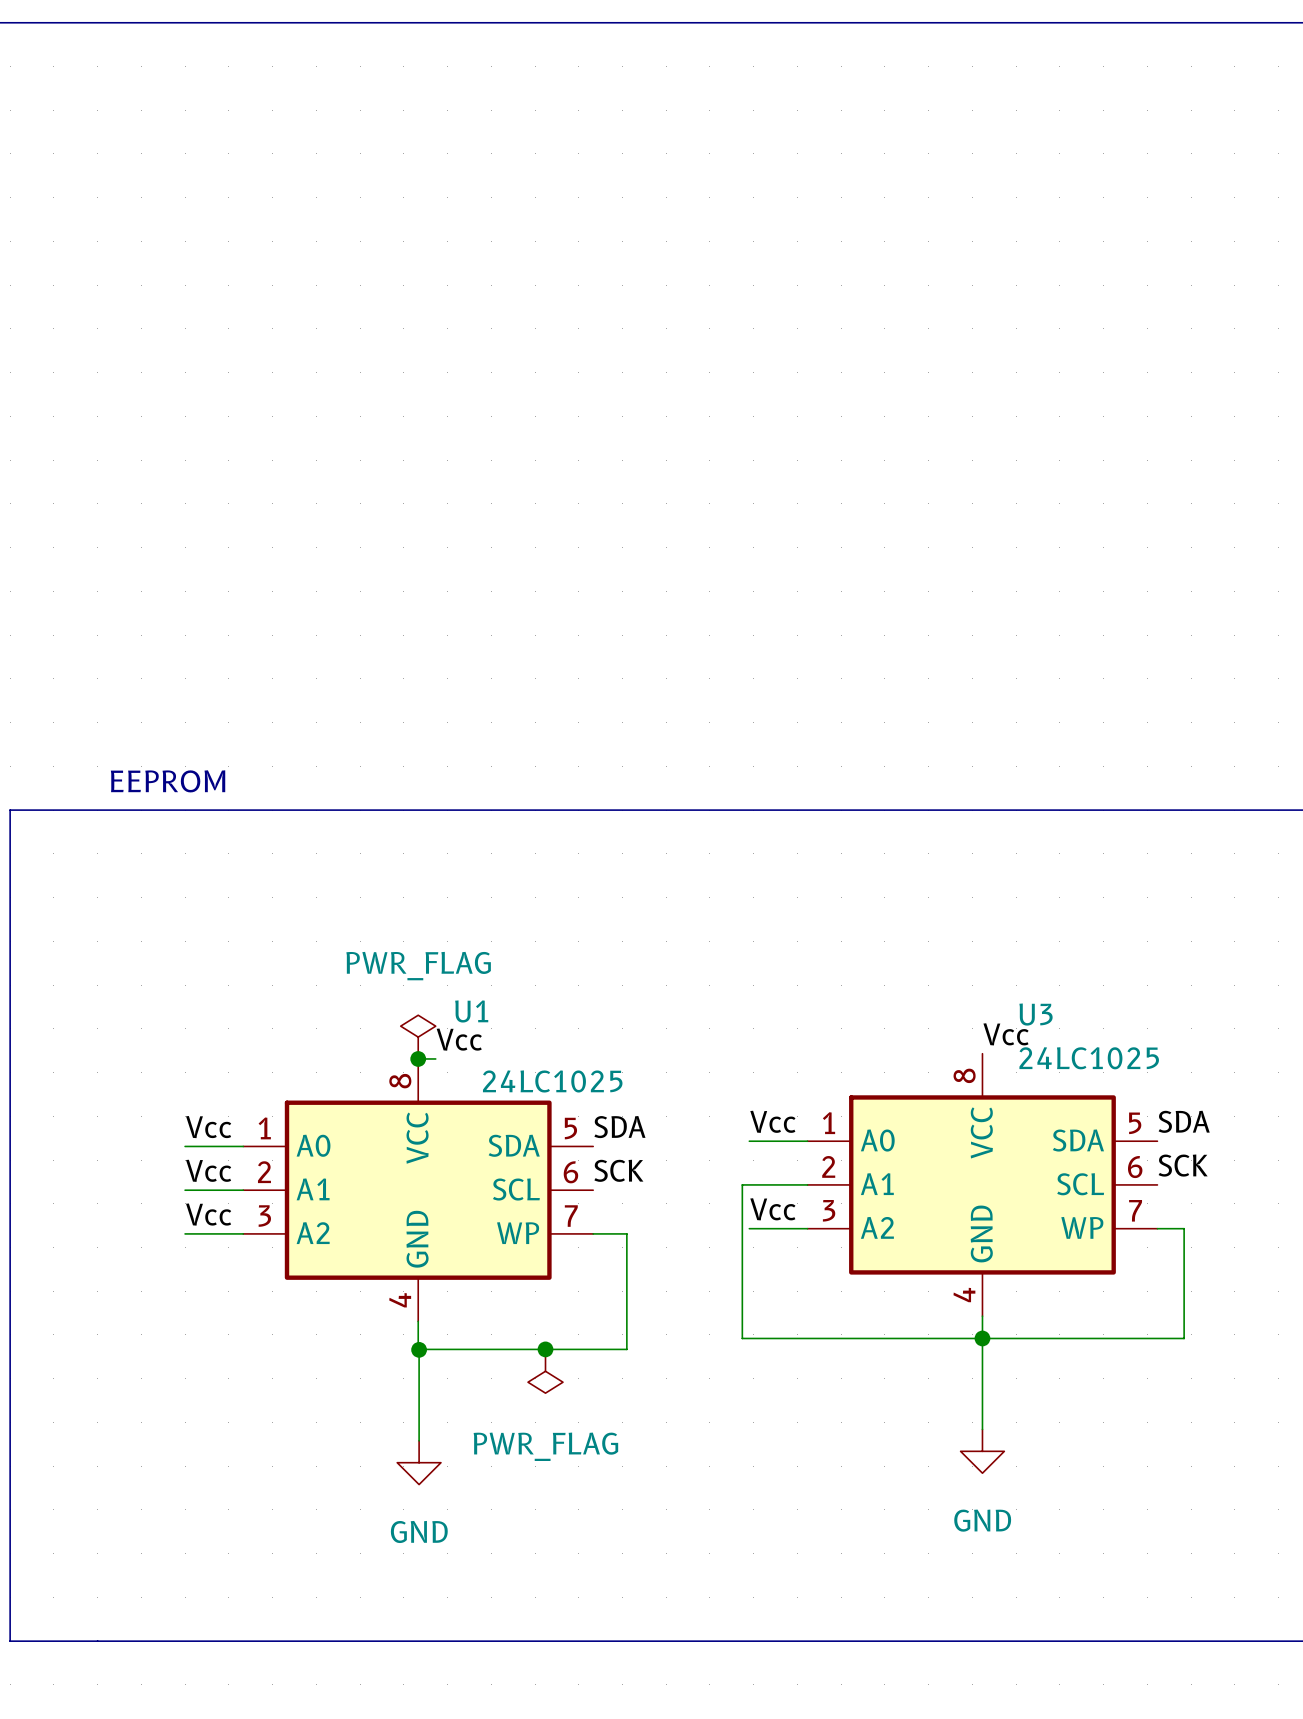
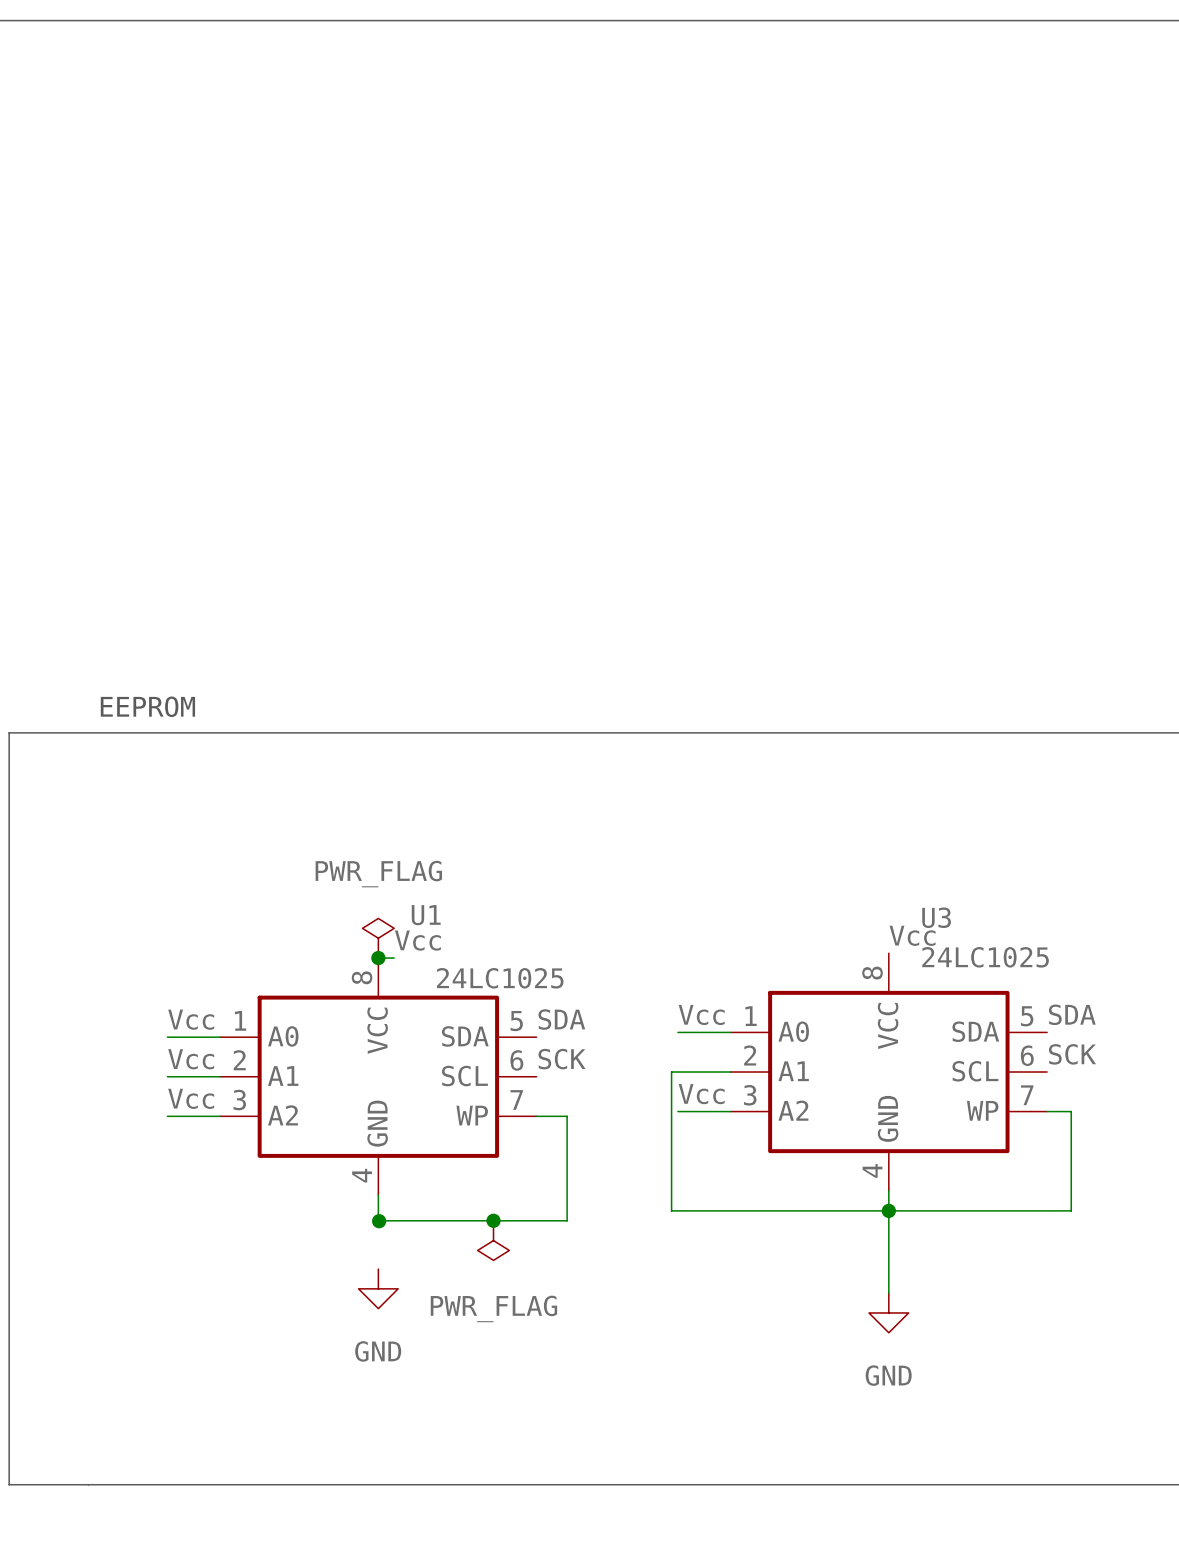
wire: (419, 1349) (419, 1440) -> none
power symbol position: GND (419, 1462) -> GND (378, 1288)

